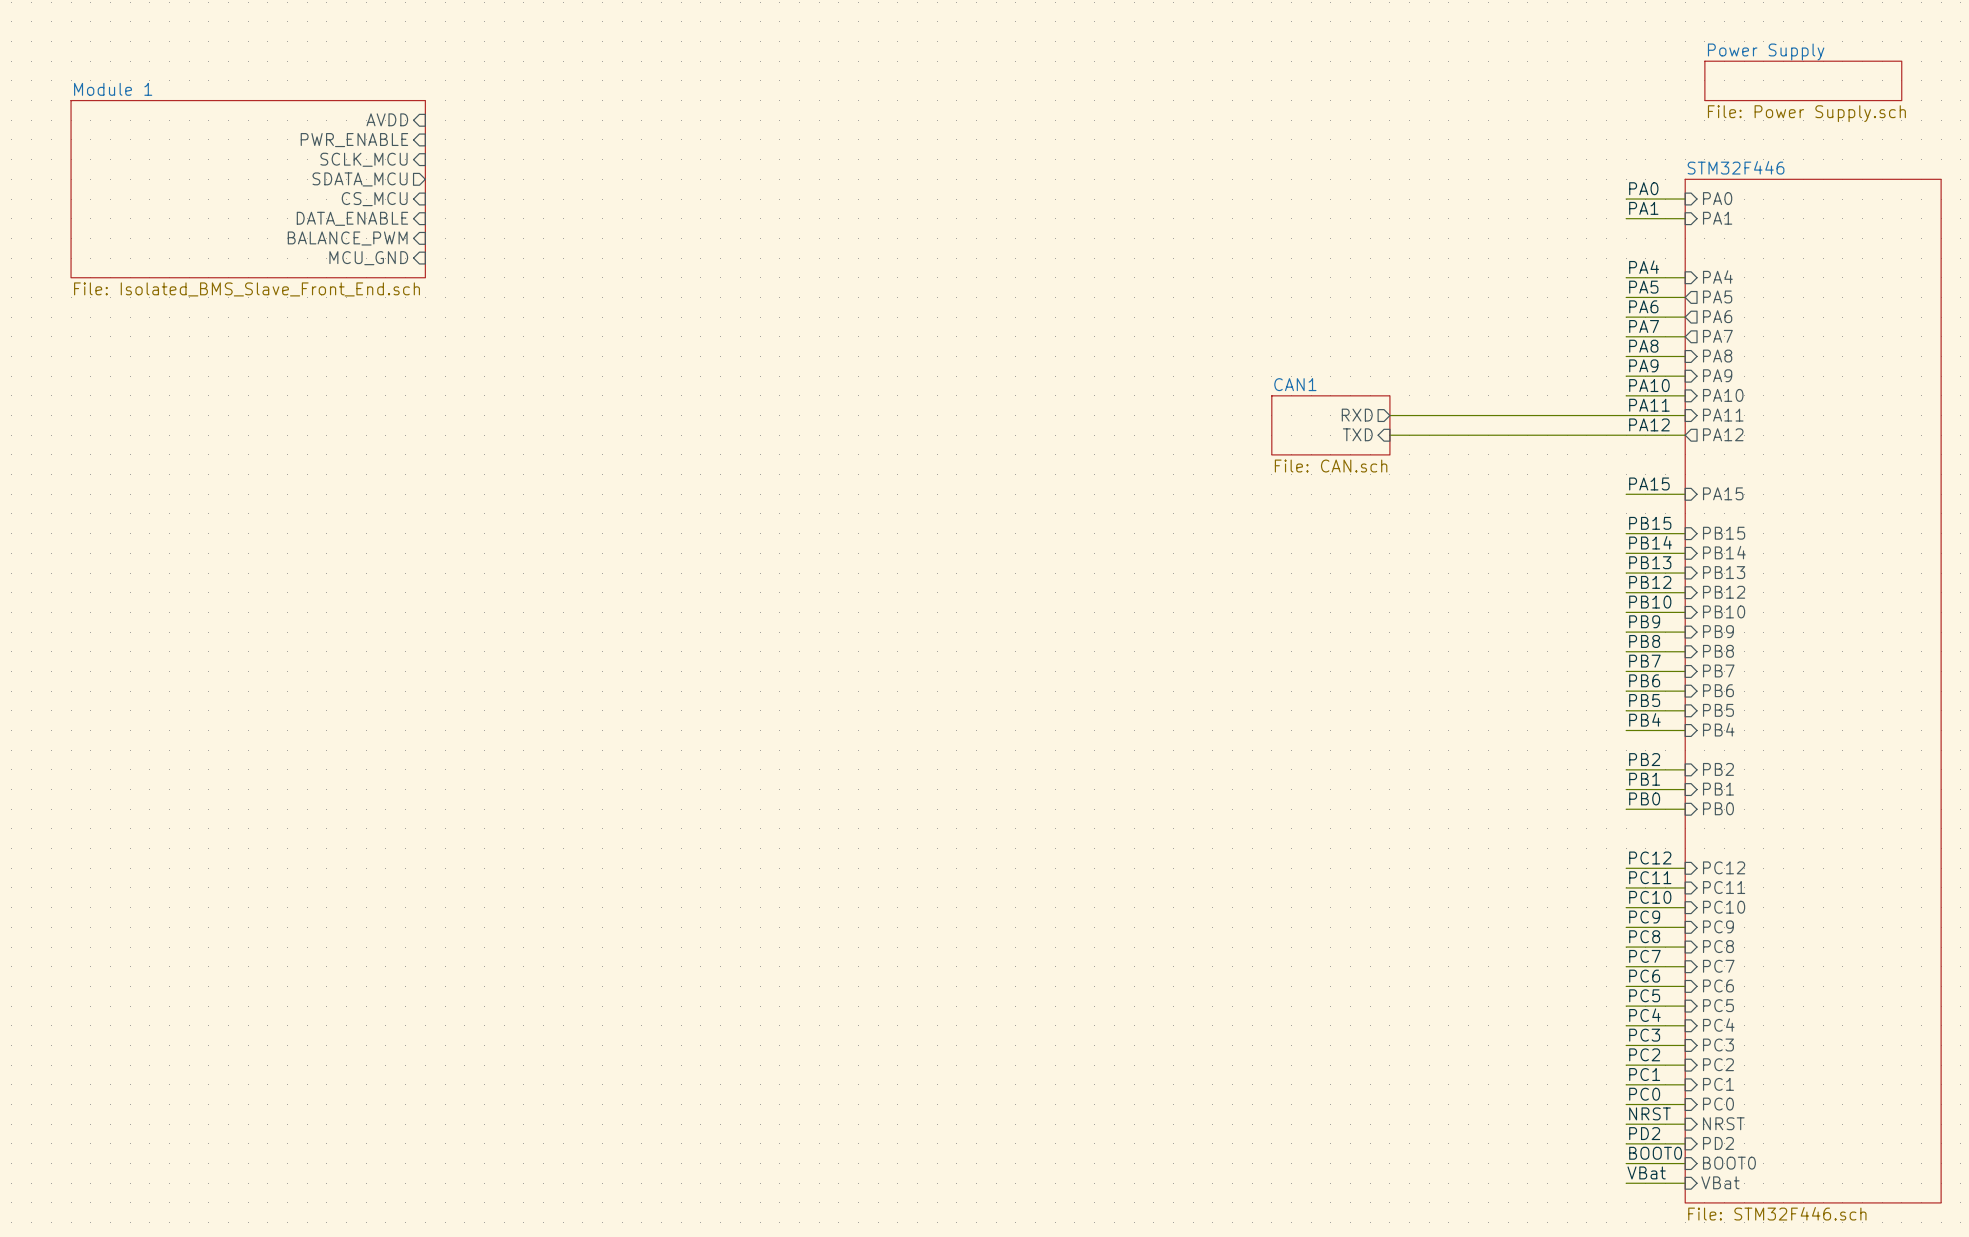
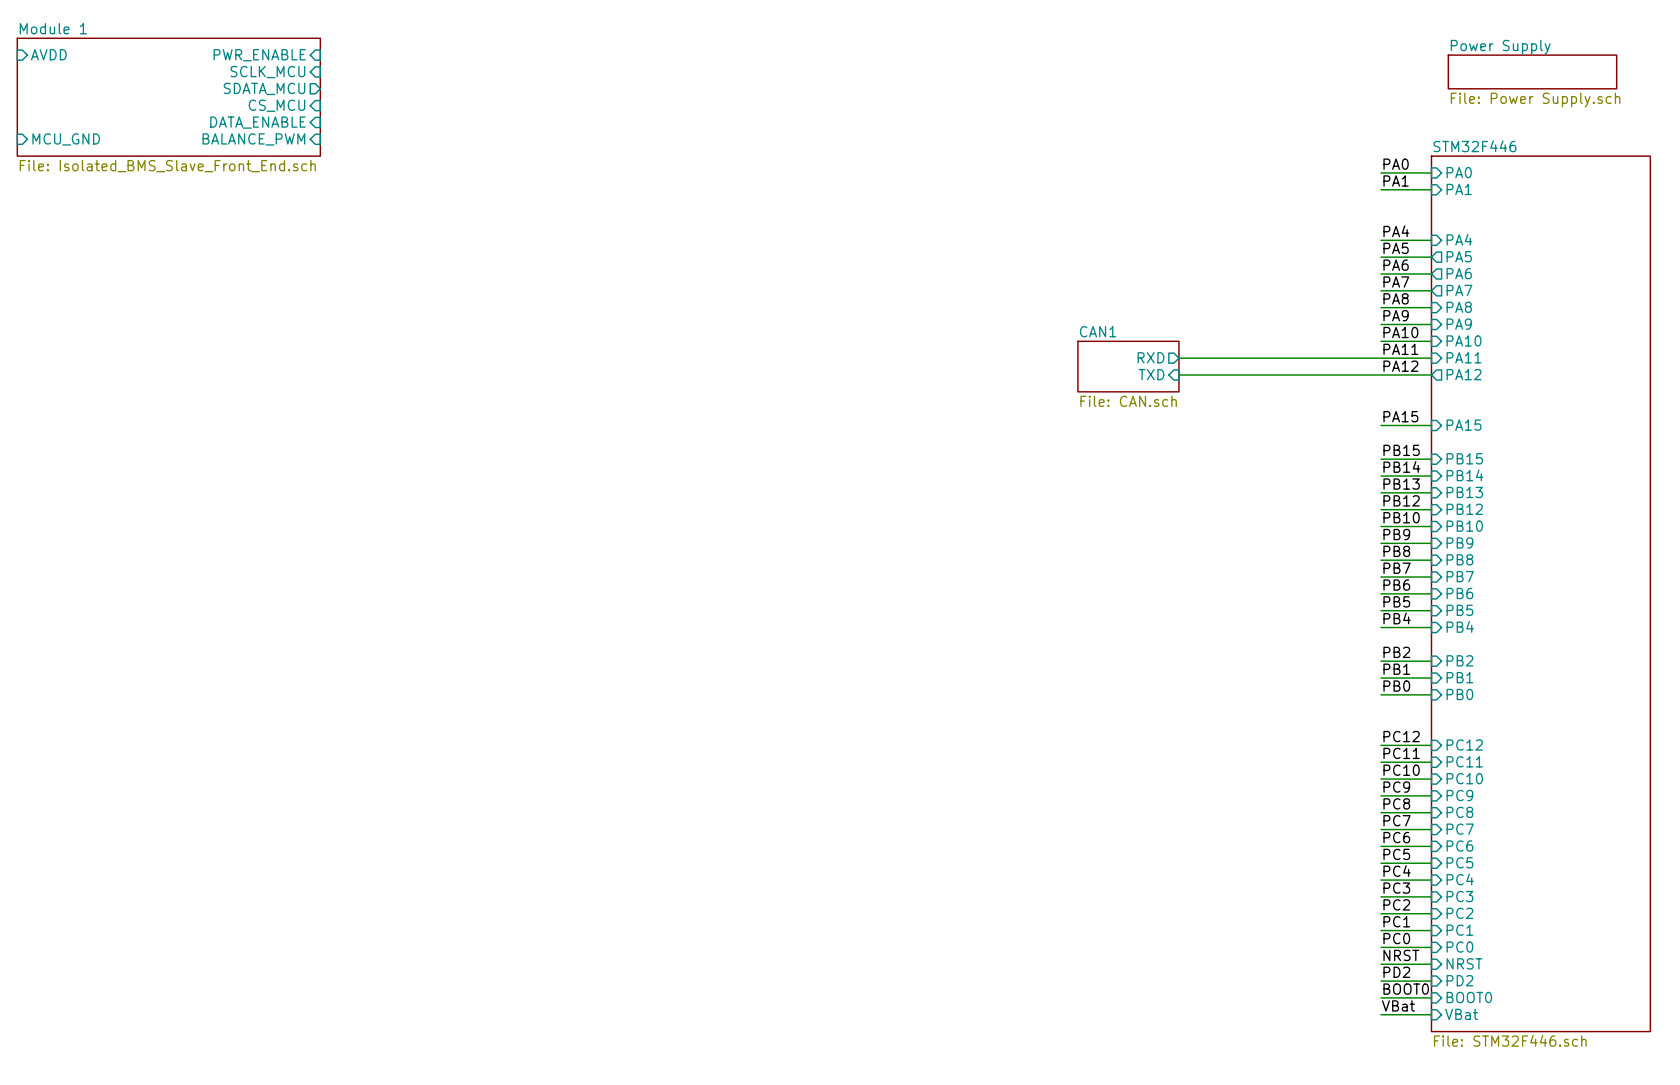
sheet pin: none -> AVDD (48, 54)
sheet Module 1 name position: Module 1 (113, 89) -> Module 1 (53, 28)
sheet Module 1 shape: [71, 100, 426, 278] -> [17, 38, 321, 157]
sheet pin: AVDD (387, 119) -> none
sheet pin position: PWR_ENABLE (354, 140) -> PWR_ENABLE (259, 55)
sheet pin: none -> MCU_GND (66, 139)
sheet pin position: SCLK_MCU (363, 159) -> SCLK_MCU (267, 72)
sheet pin position: SDATA_MCU (360, 179) -> SDATA_MCU (264, 88)
sheet pin position: CS_MCU (374, 199) -> CS_MCU (276, 105)
sheet pin position: DATA_ENABLE (352, 218) -> DATA_ENABLE (257, 122)
sheet pin position: BALANCE_PWM (347, 238) -> BALANCE_PWM (253, 139)
sheet pin: MCU_GND (368, 258) -> none
sheet Module 1 value position: File: Isolated_BMS_Slave_Front_End.sch (247, 289) -> File: Isolated_BMS_Slave_Front_End.sch (167, 166)

